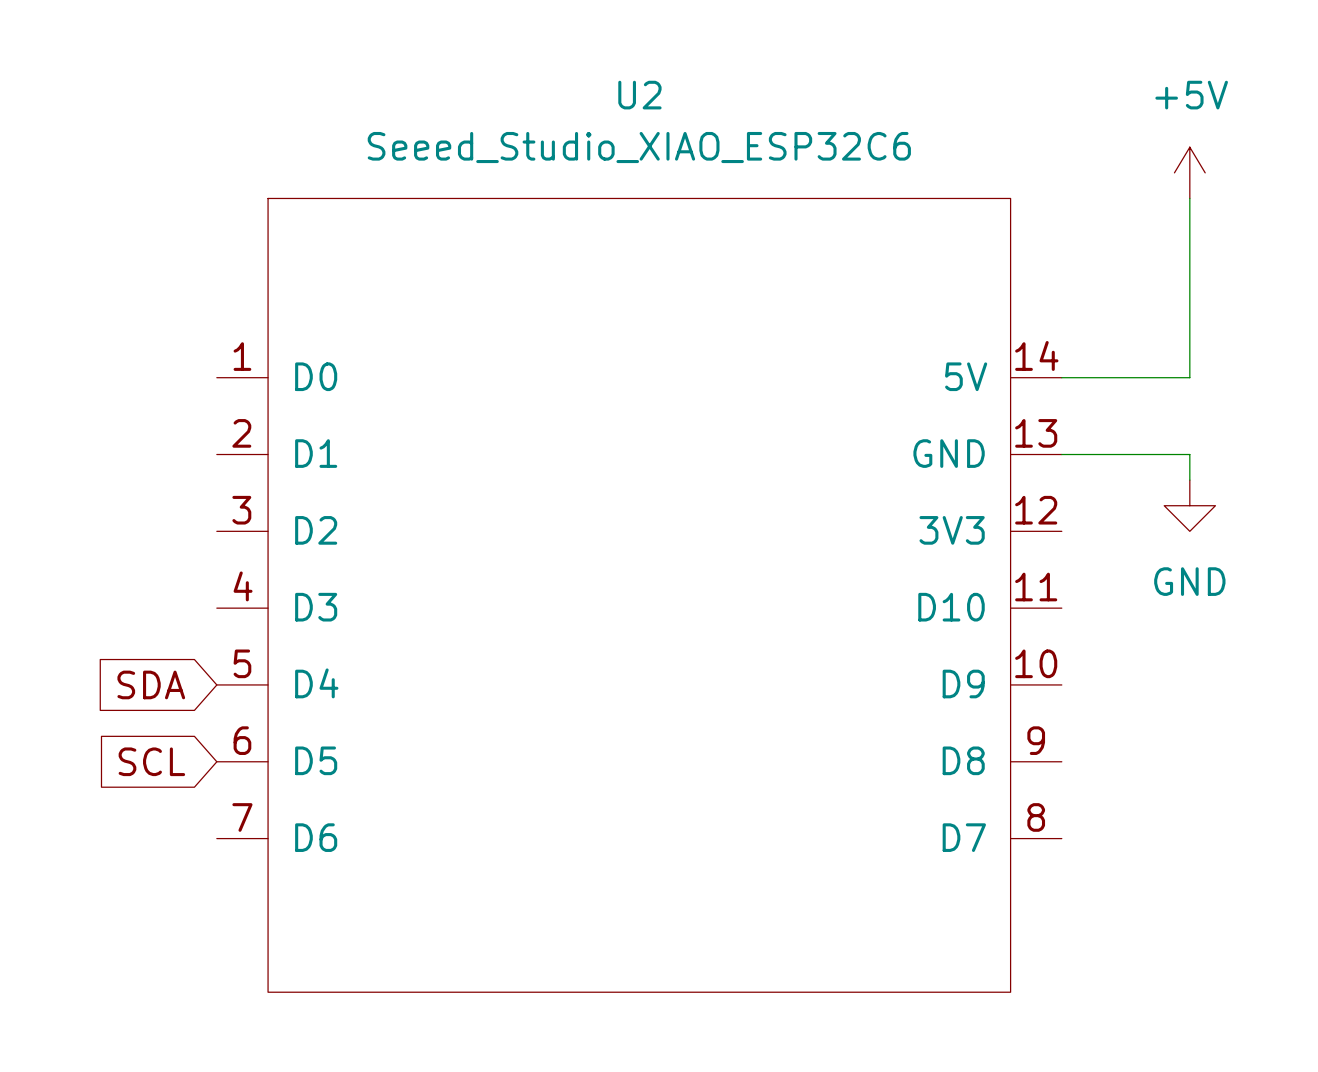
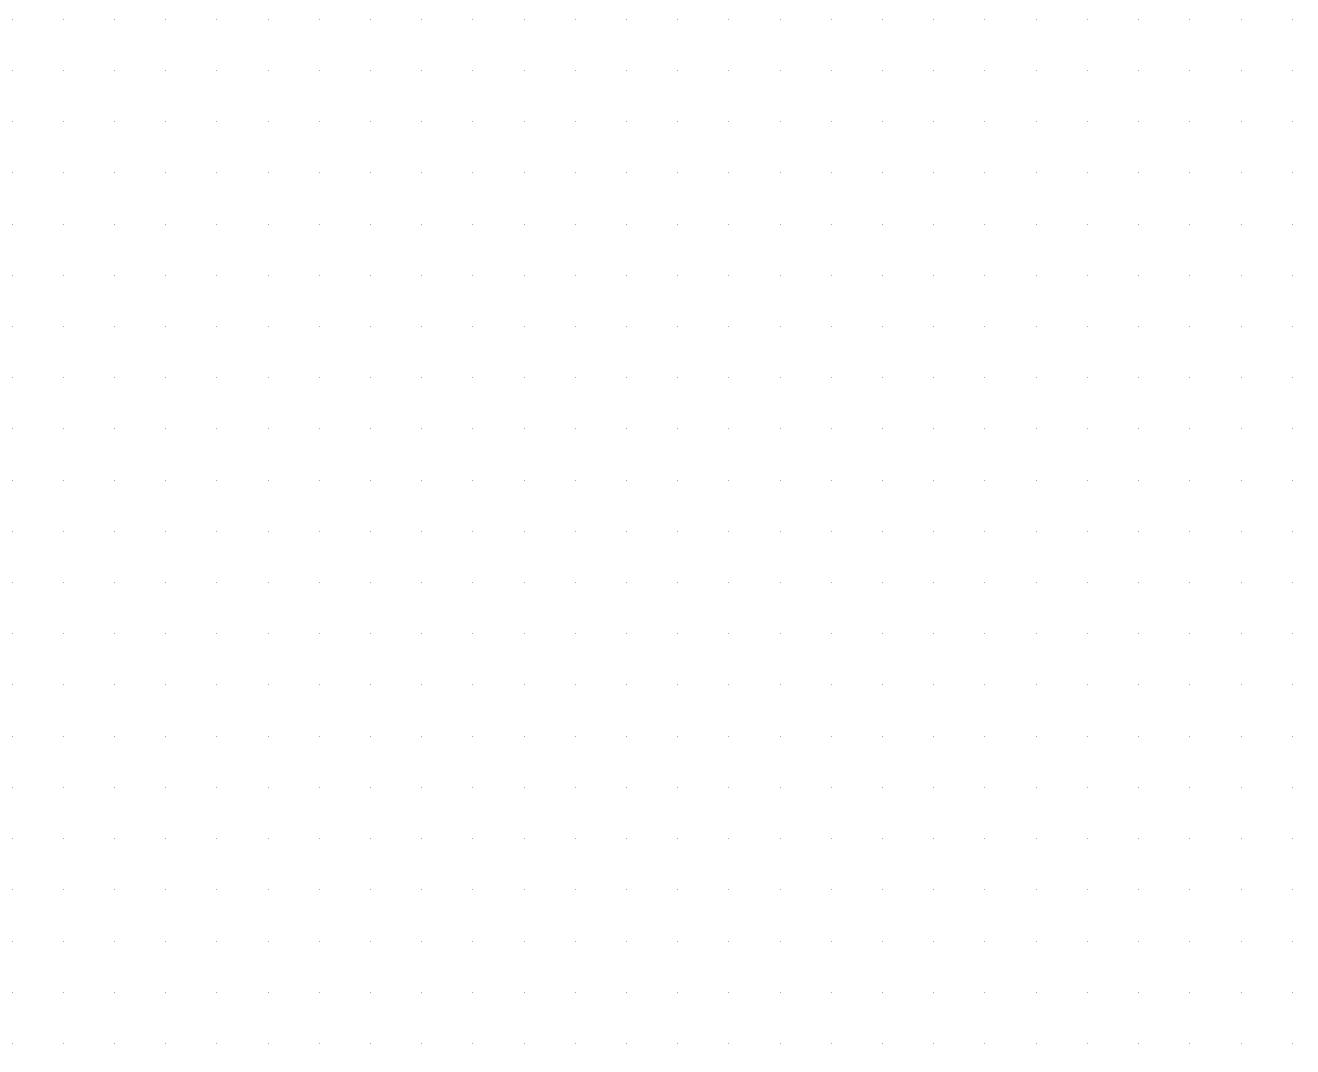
power symbol: +5V (1189, 172) -> none
wire: (1189, 198) (1189, 377) (1061, 377) -> none
wire: (1061, 454) (1189, 454) (1189, 480) -> none
power symbol: GND (1189, 505) -> none
U2: Seeed_Studio_XIAO_ESP32C6 (639, 595) -> none
global label: SDA (151, 684) -> none
global label: SCL (151, 761) -> none

